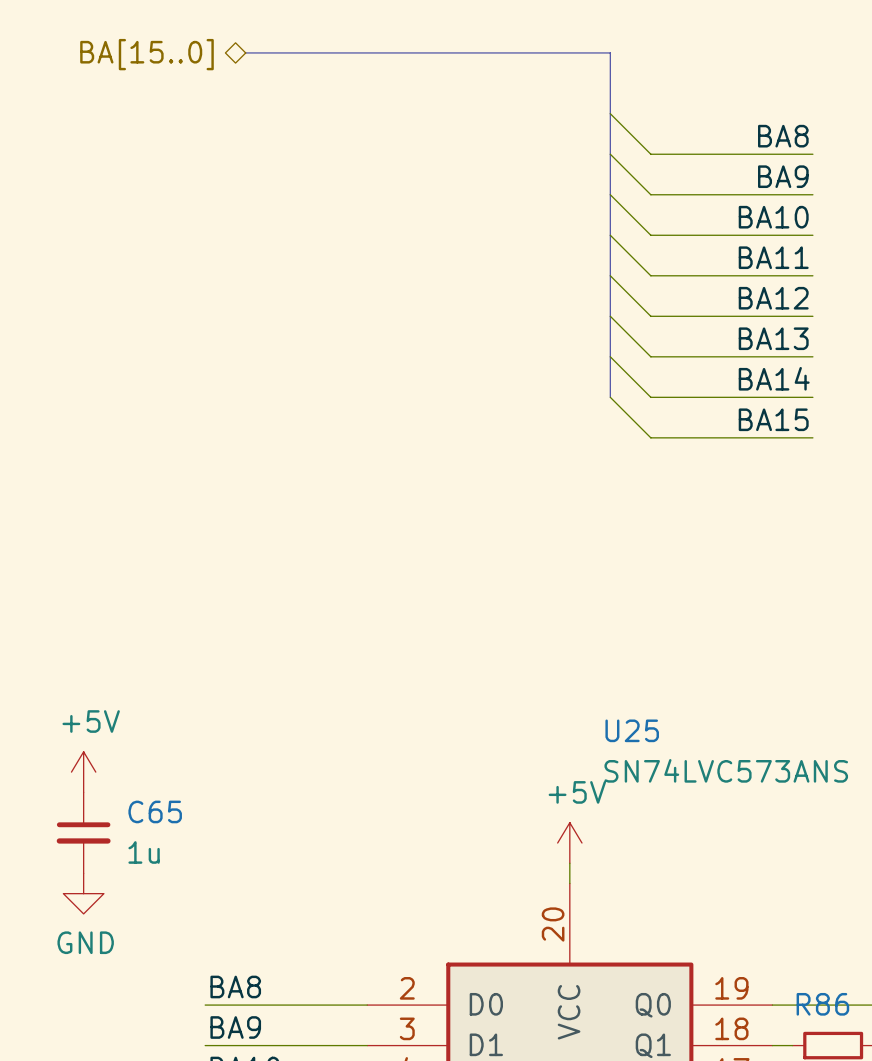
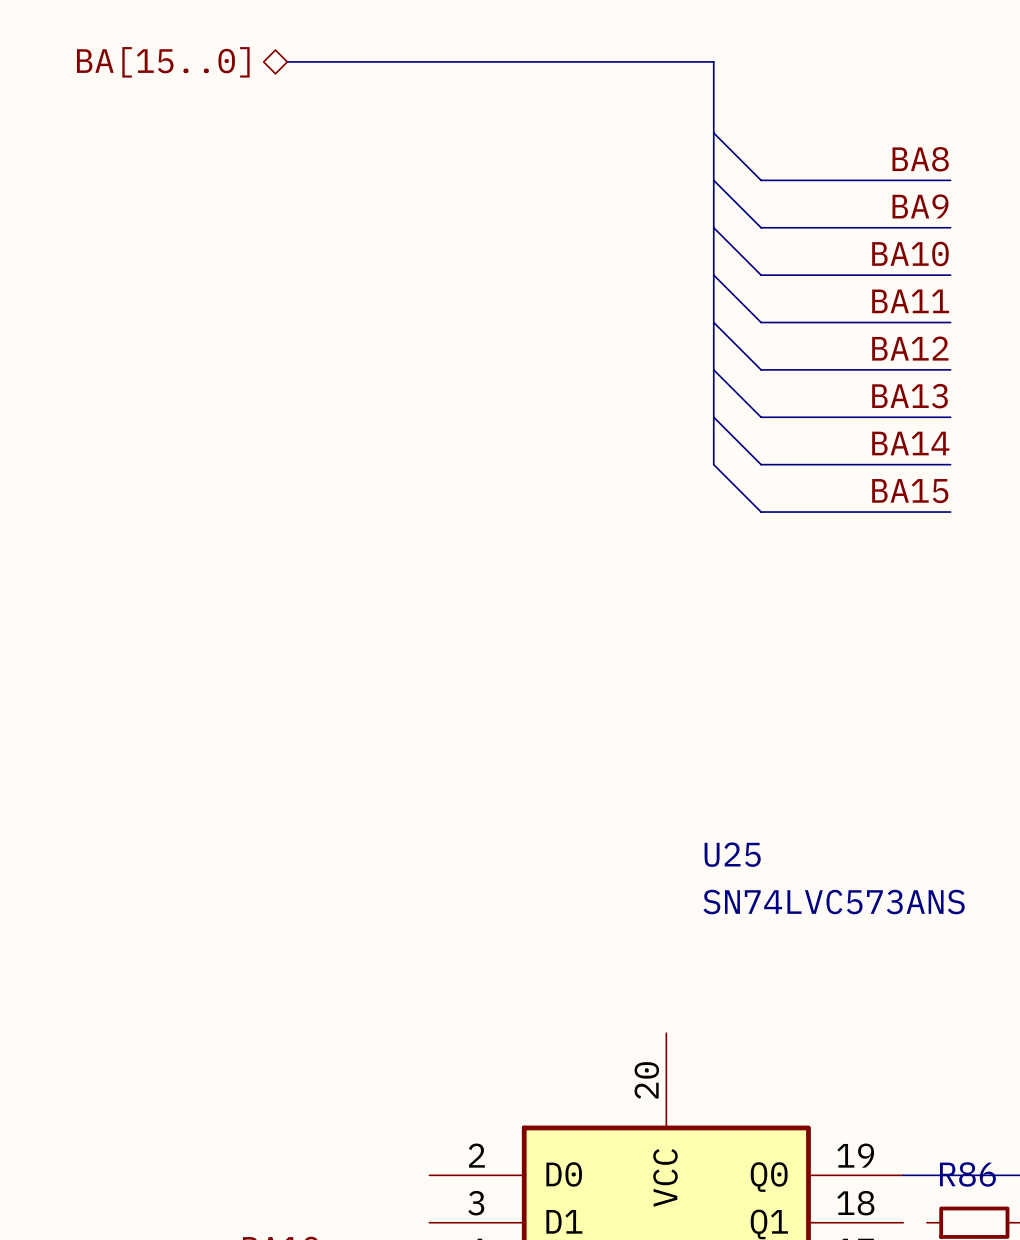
power symbol: +5V (83, 772) -> none
C65: 1u (83, 832) -> none
power symbol: +5V (569, 843) -> none
wire: (569, 863) (569, 883) -> none
power symbol: GND (83, 893) -> none
label: BA8 (235, 986) -> none
wire: (205, 1005) (367, 1005) -> none
label: BA9 (235, 1027) -> none
wire: (205, 1045) (367, 1045) -> none
wire: (772, 1045) (792, 1045) -> none

